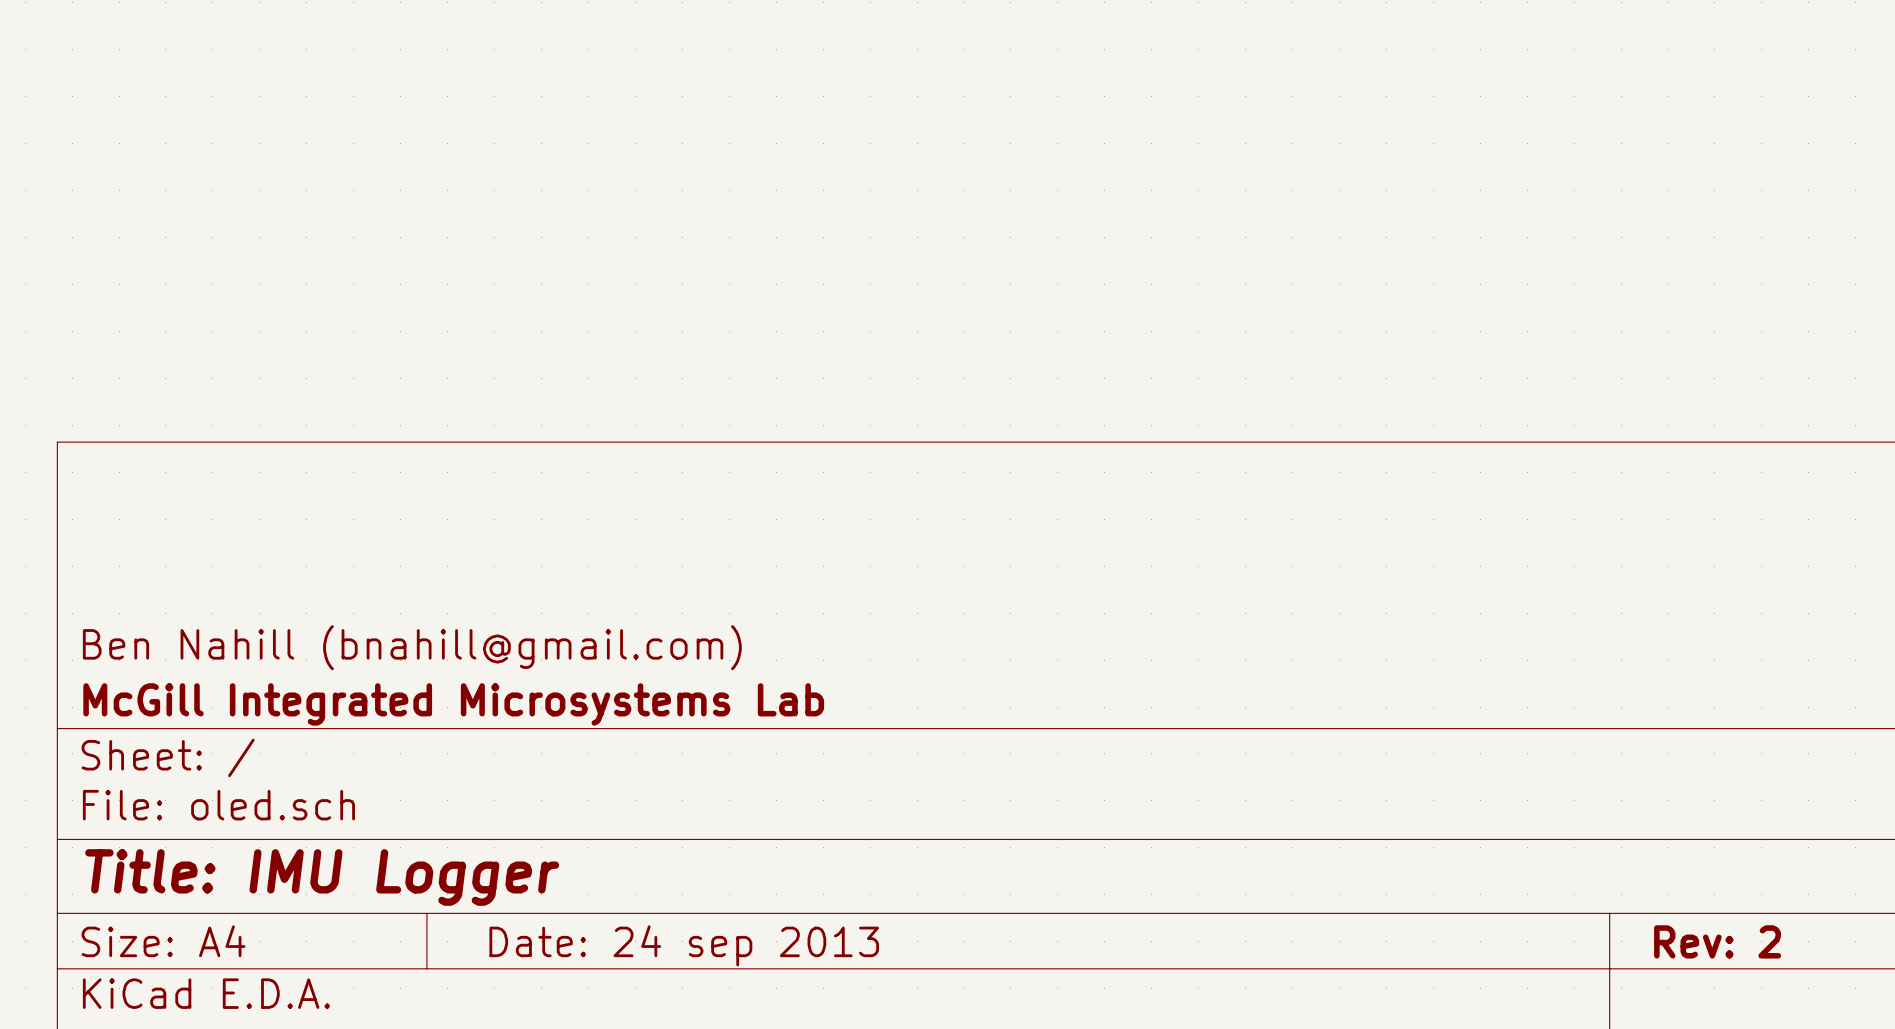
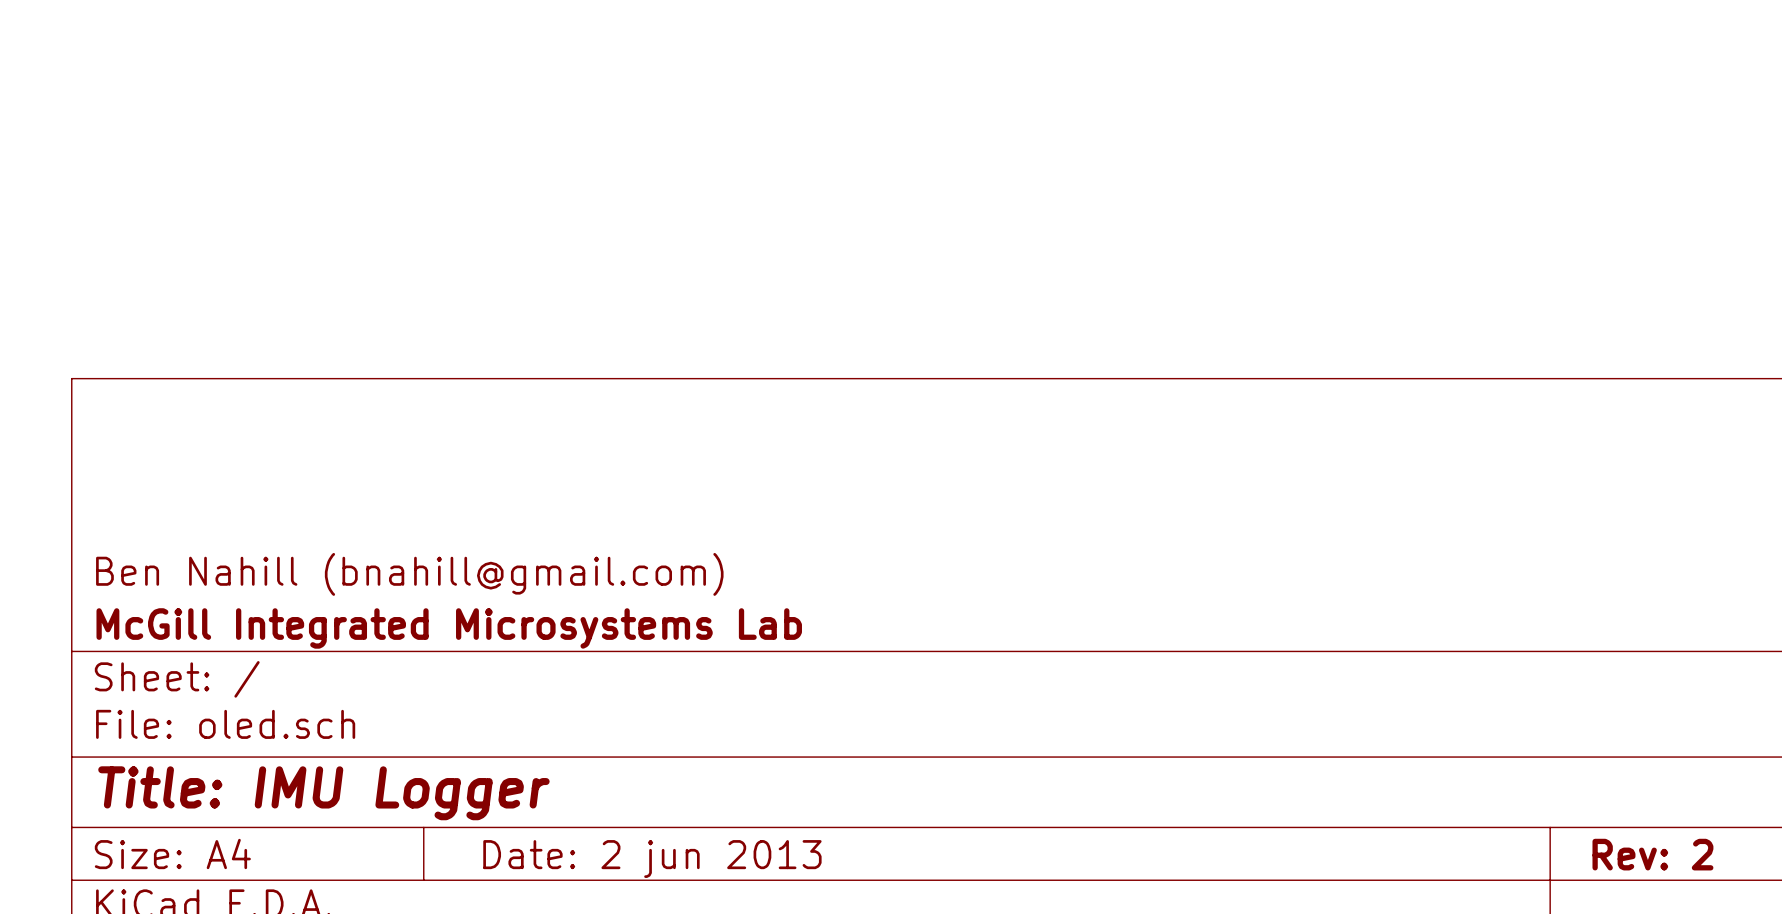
title block: Date: 24 sep 2013 (684, 945) -> Date: 2 jun 2013 (652, 859)

